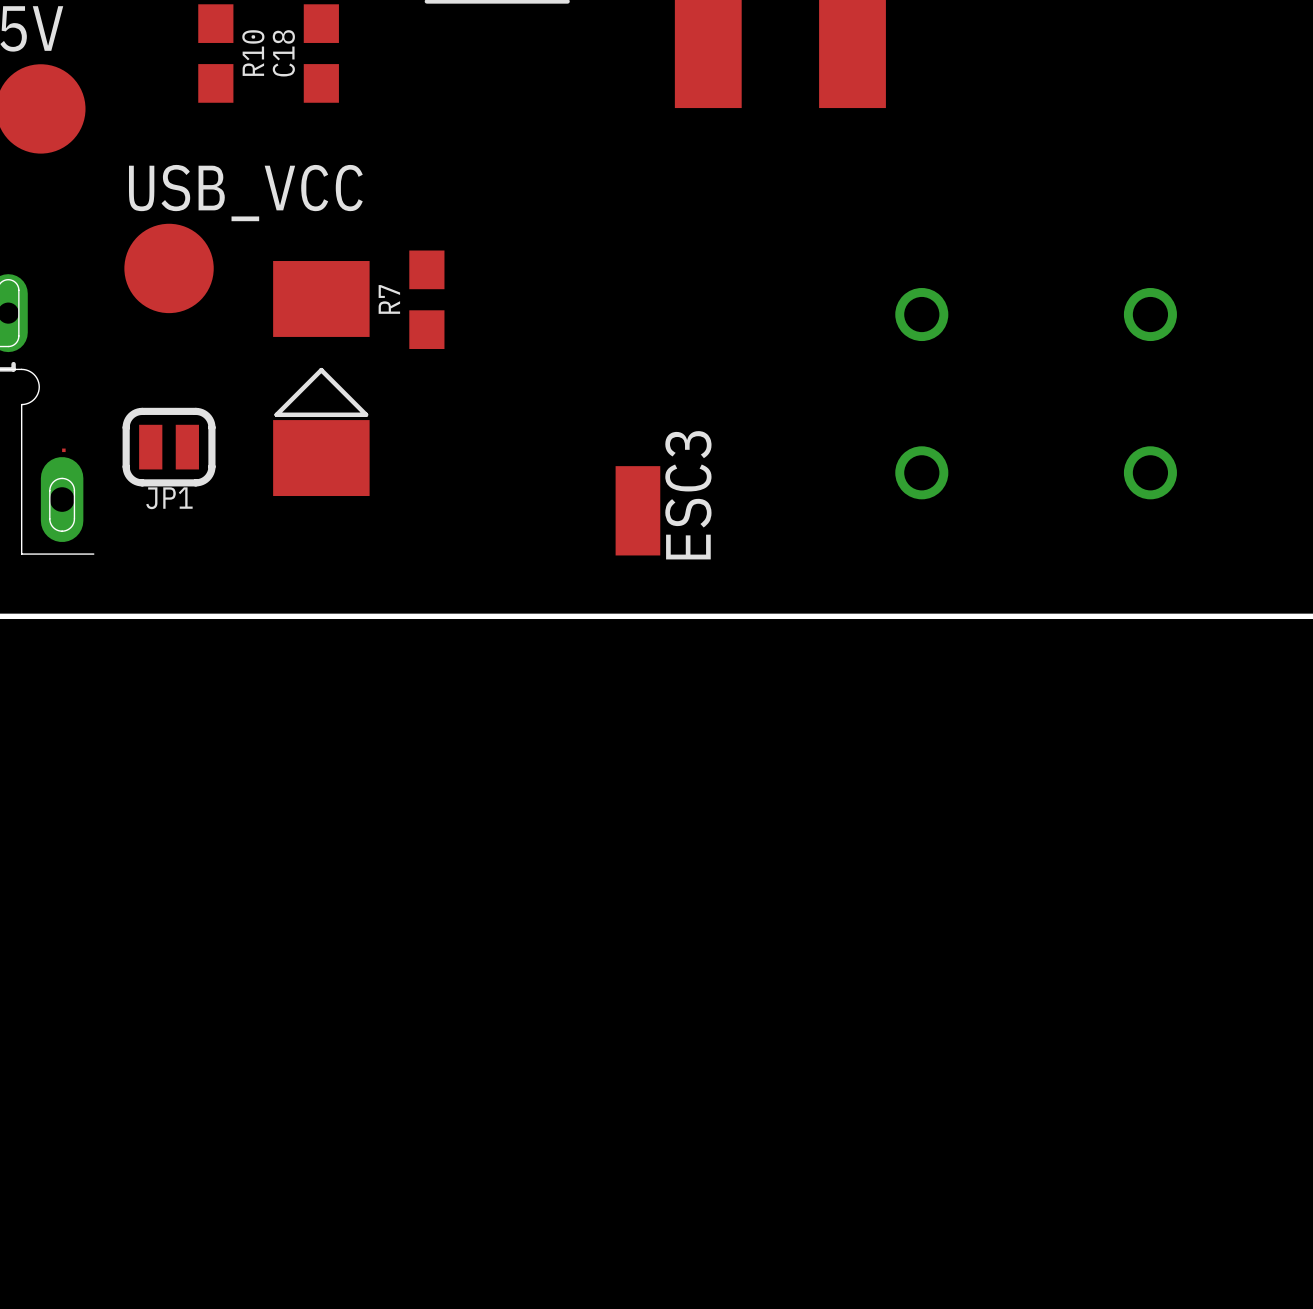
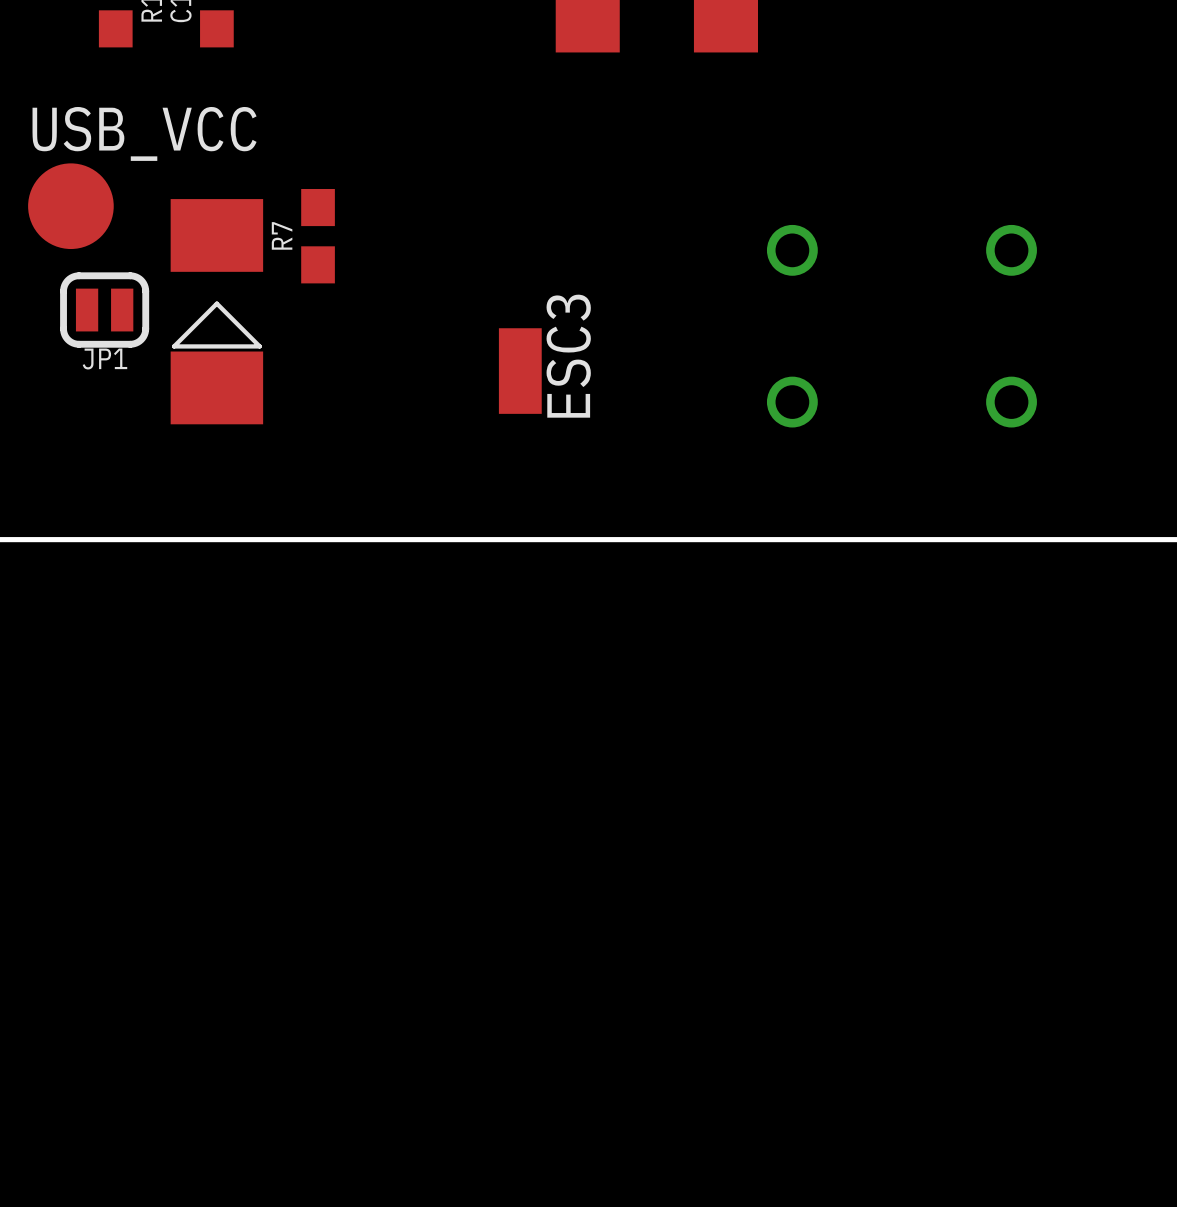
JP1 position: (169, 447) -> (104, 310)
ESC3 position: (637, 510) -> (520, 371)

